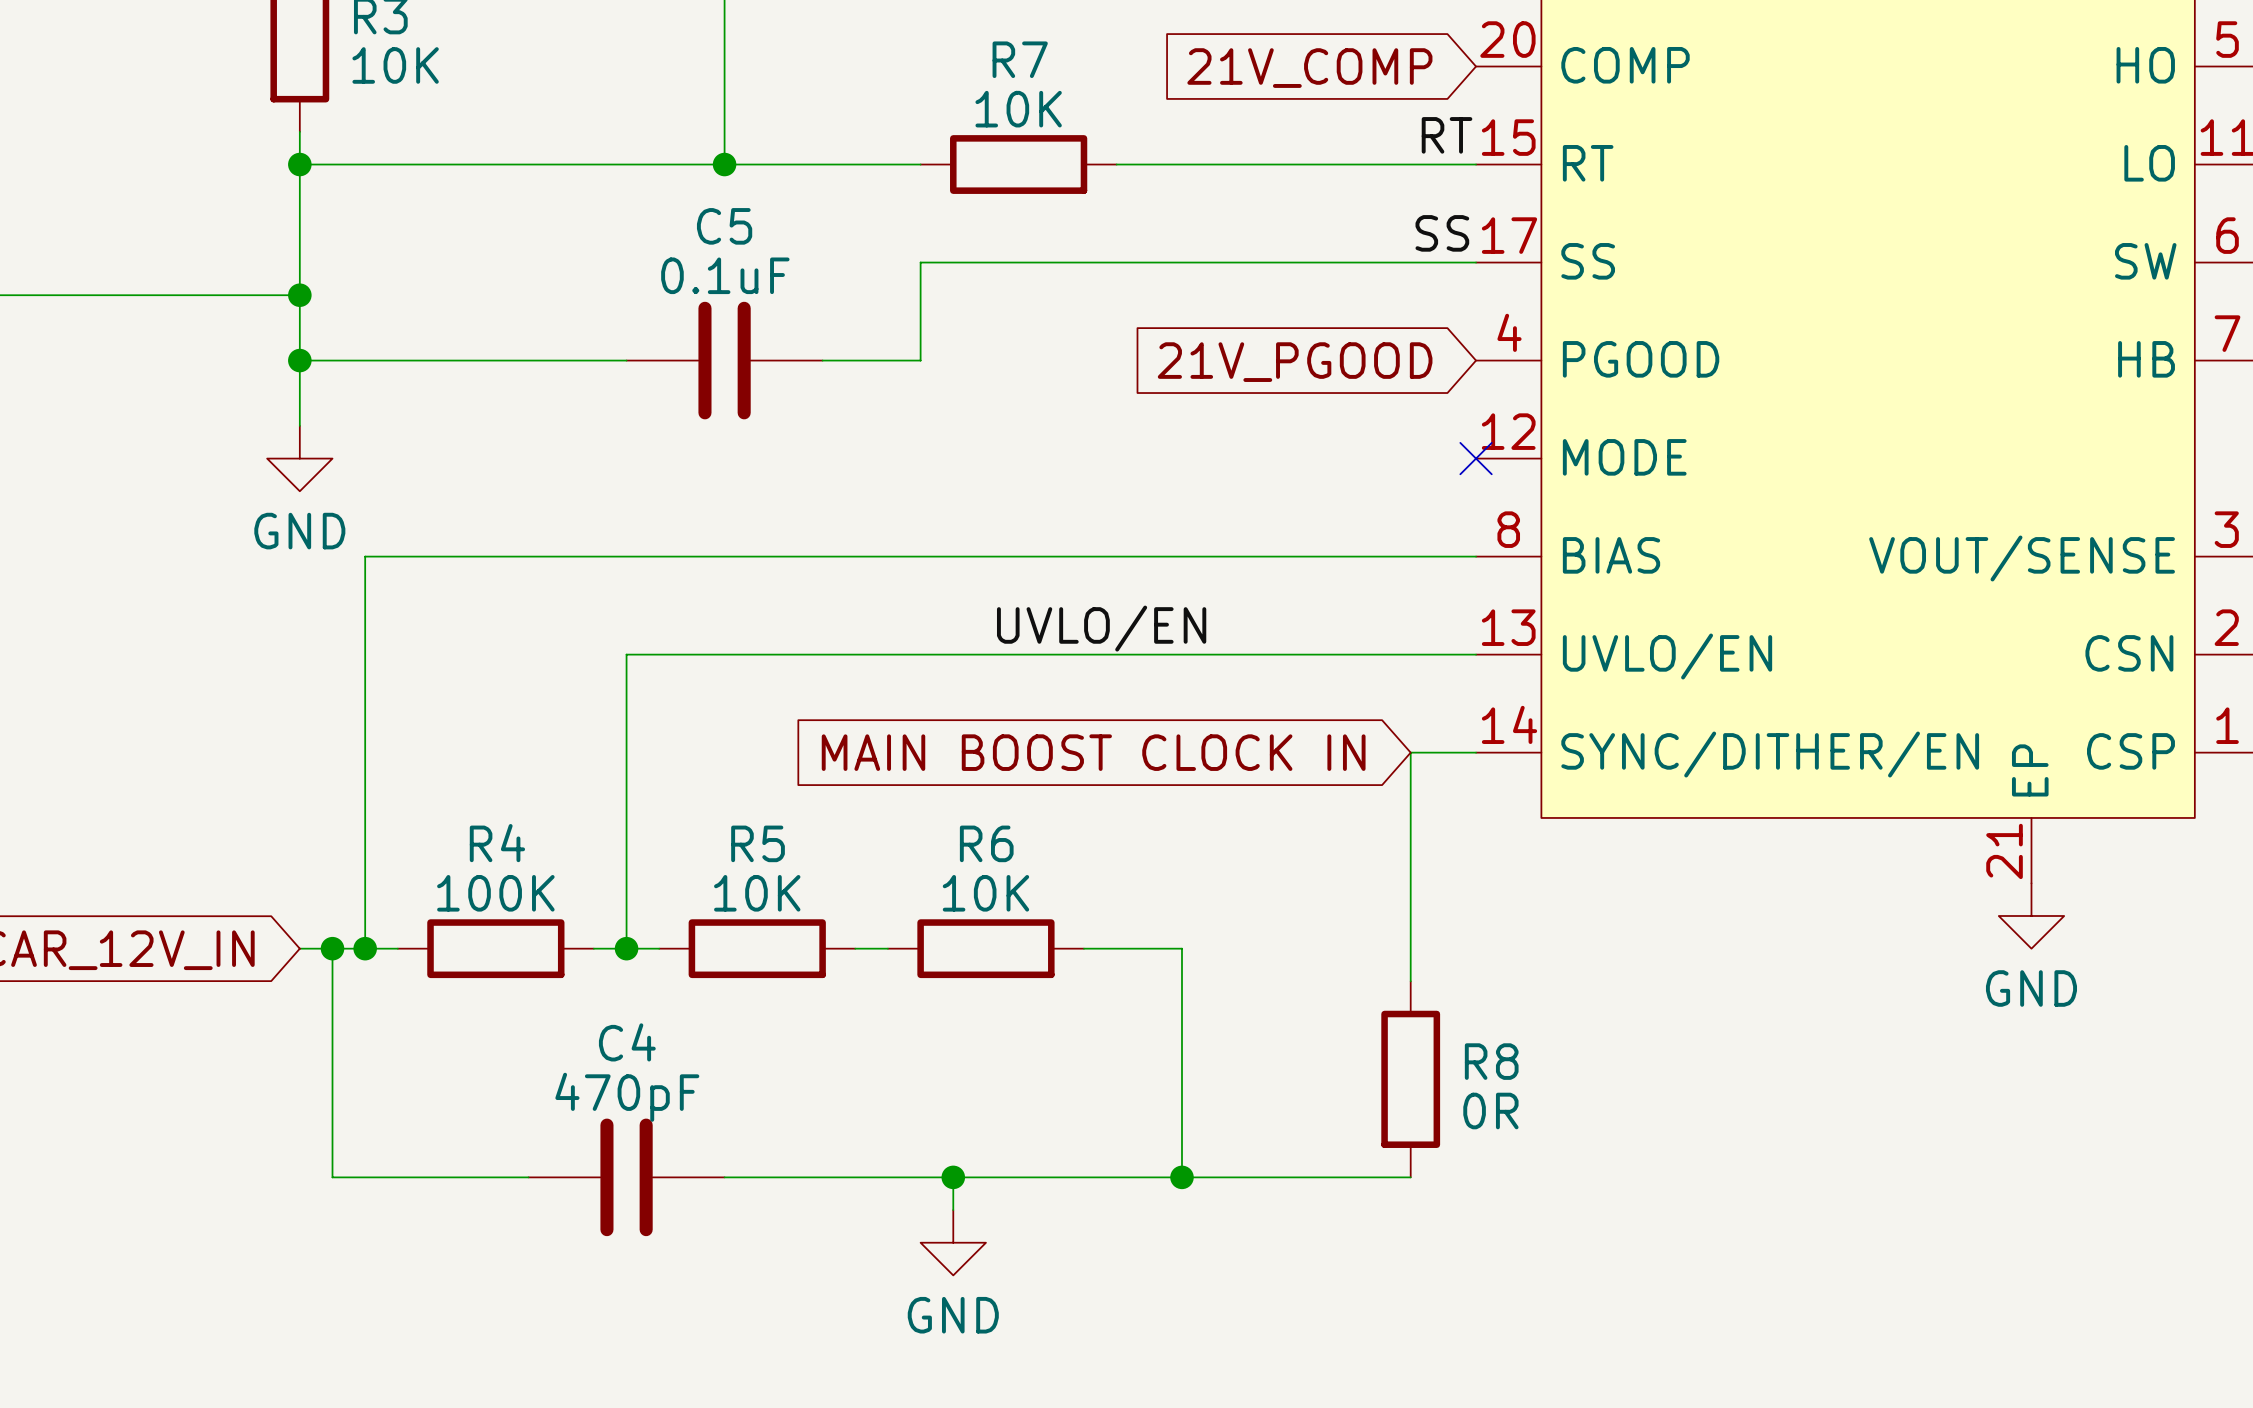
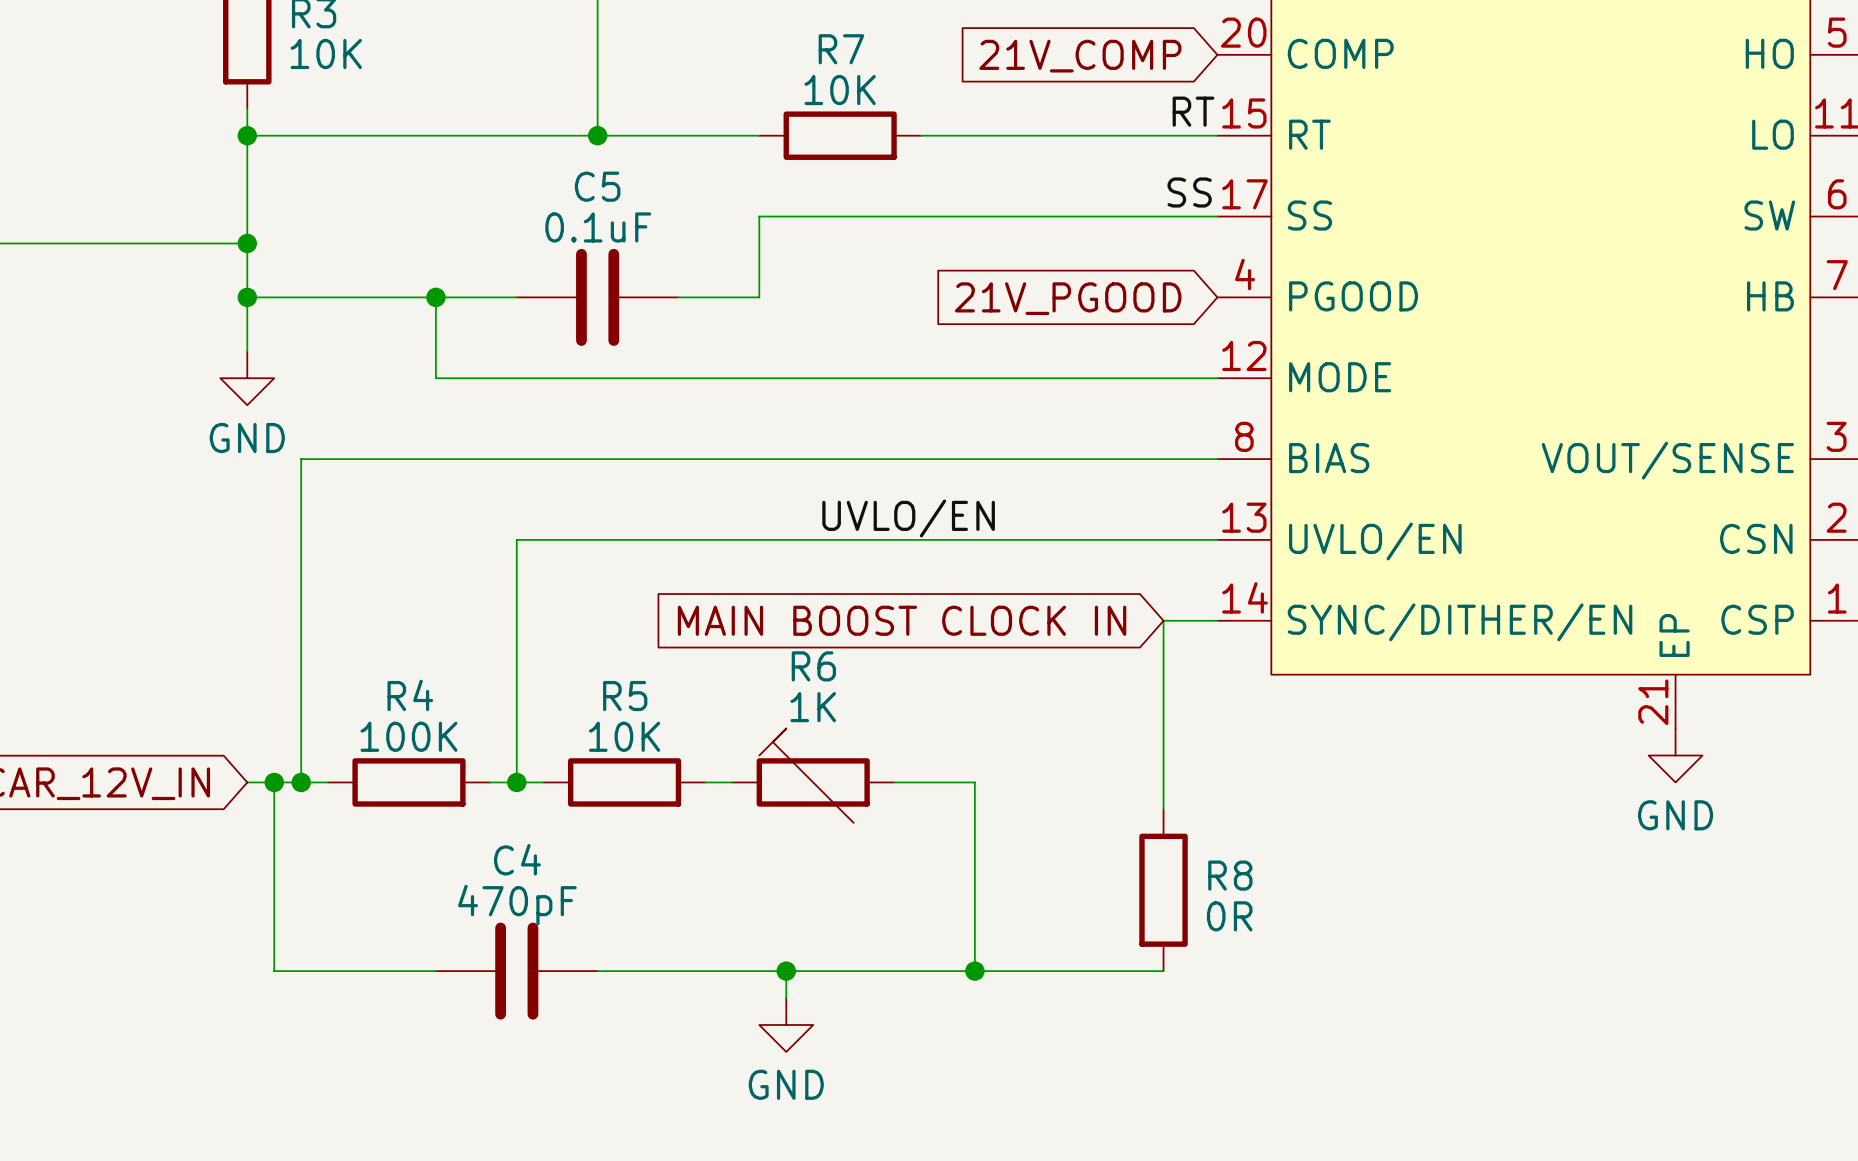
wire: none -> (435, 297) (435, 378) (1217, 378)
junction: none -> (435, 297)
no-connect mark: (1476, 458) -> none
R6 value: 10K (985, 893) -> 1K (813, 707)
R6 symbol: [887, 919, 1084, 979] -> [732, 728, 895, 823]

